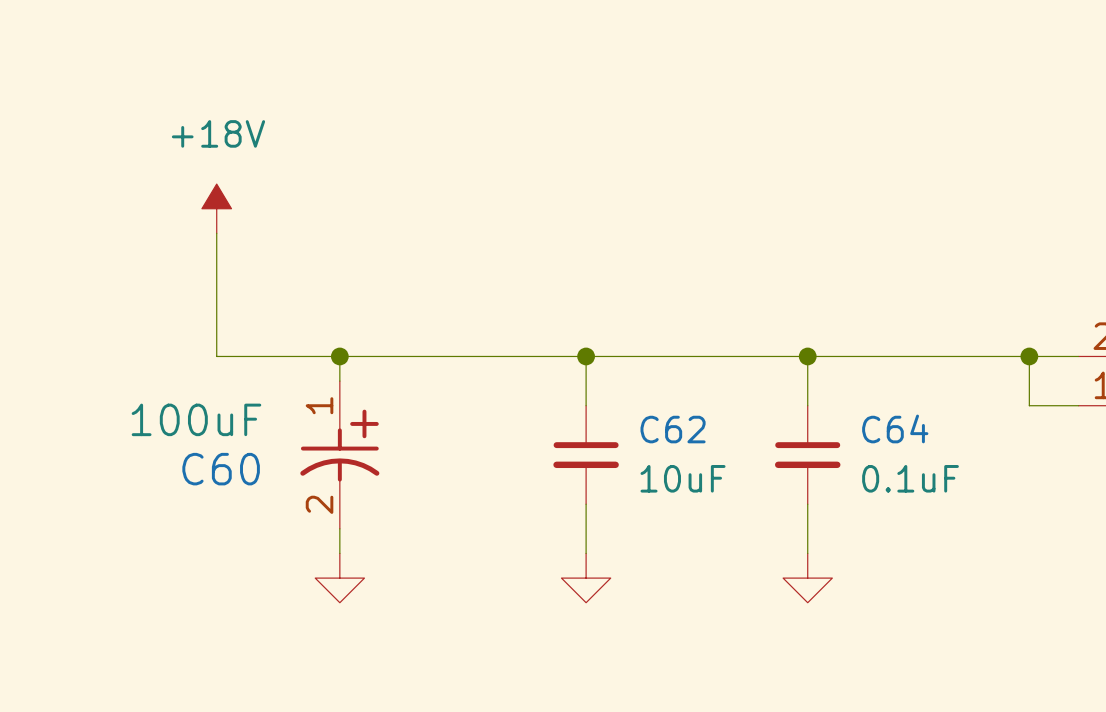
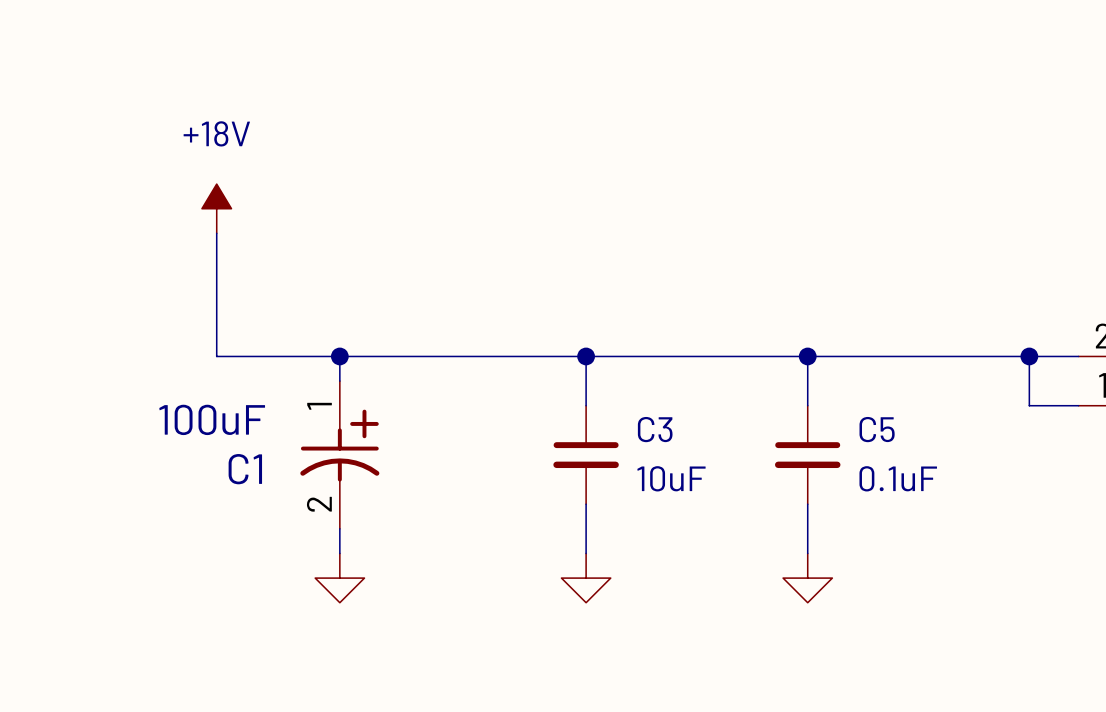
C64 name: C64 (895, 428) -> C5 (877, 429)
C62 name: C62 (673, 429) -> C3 (655, 429)
C60 name: C60 (221, 469) -> C1 (245, 469)

